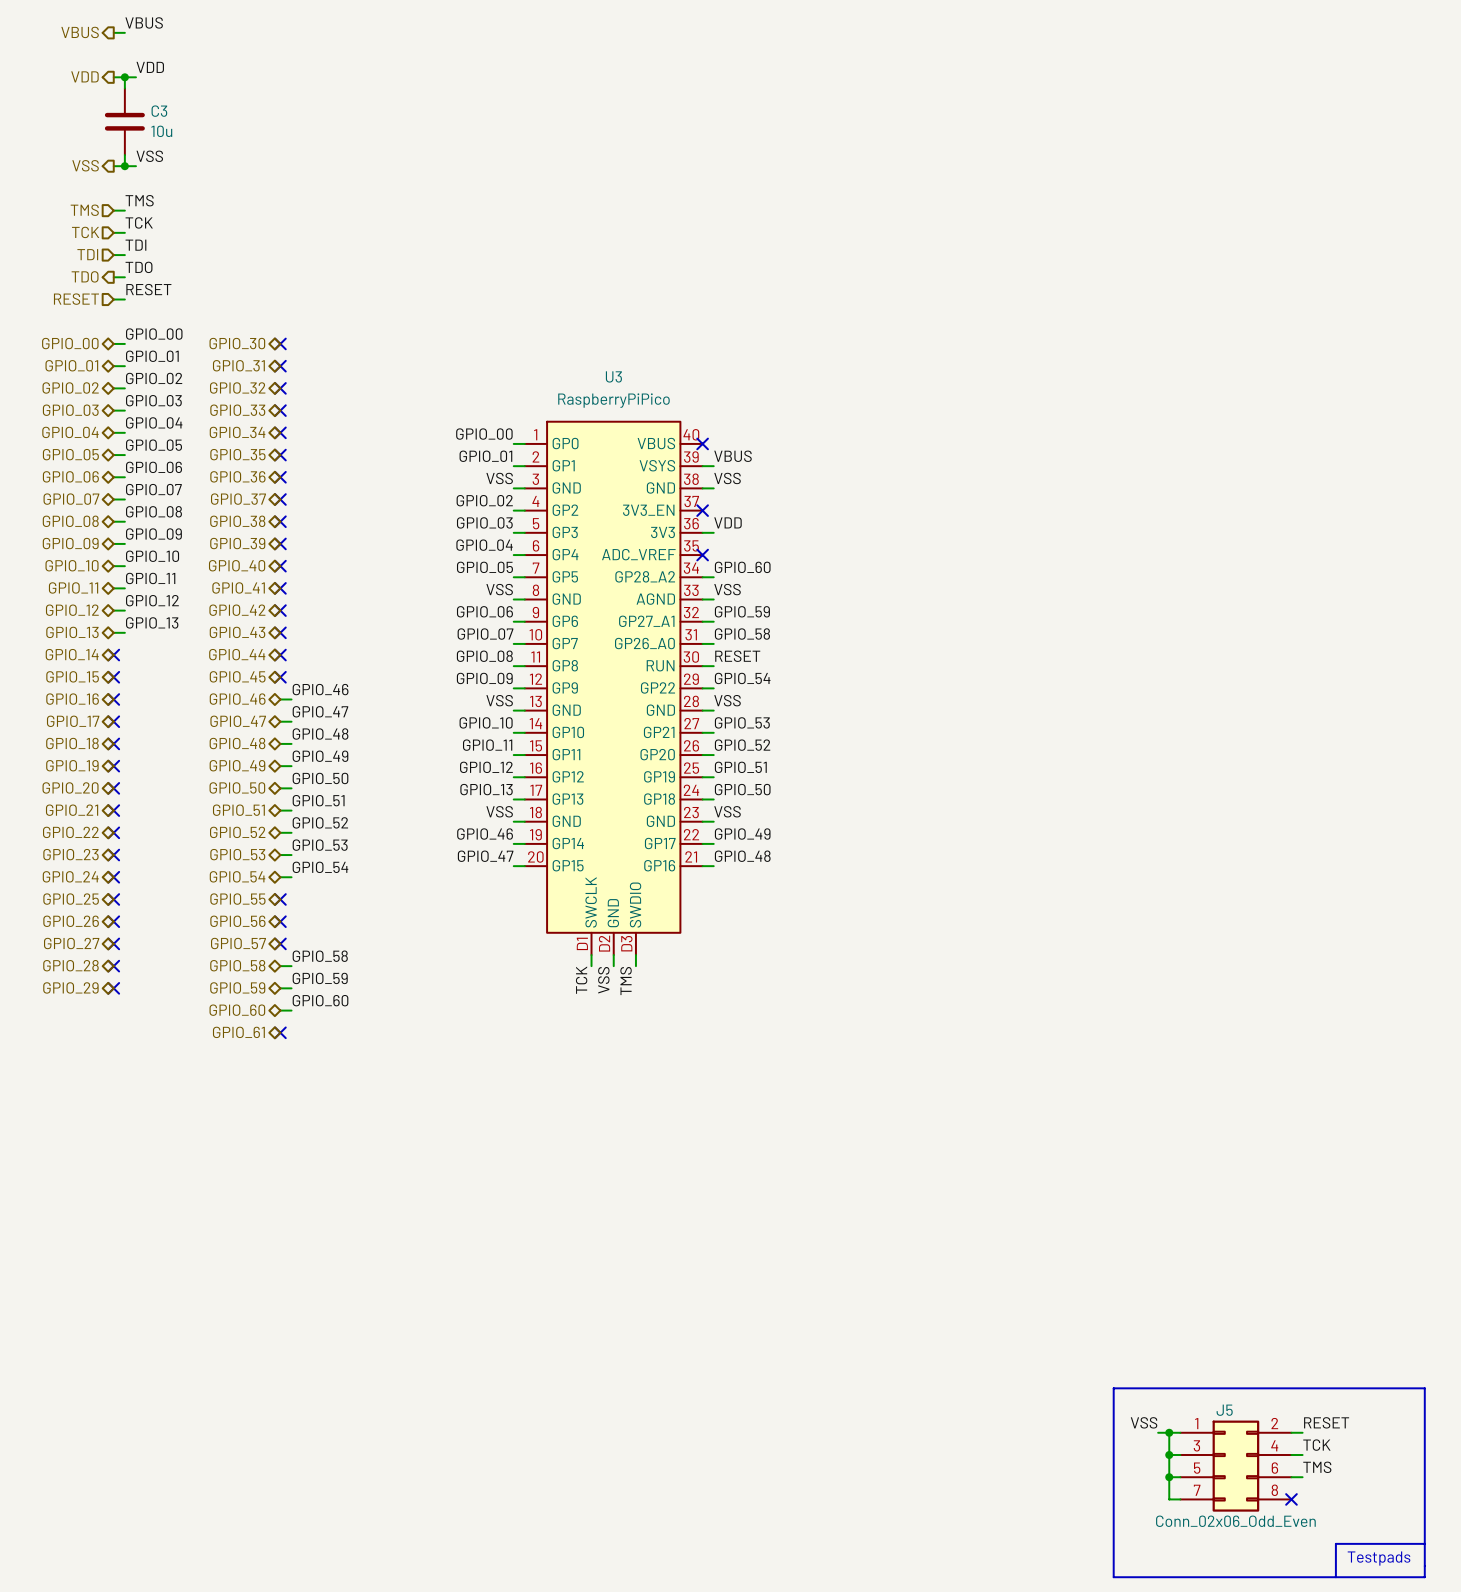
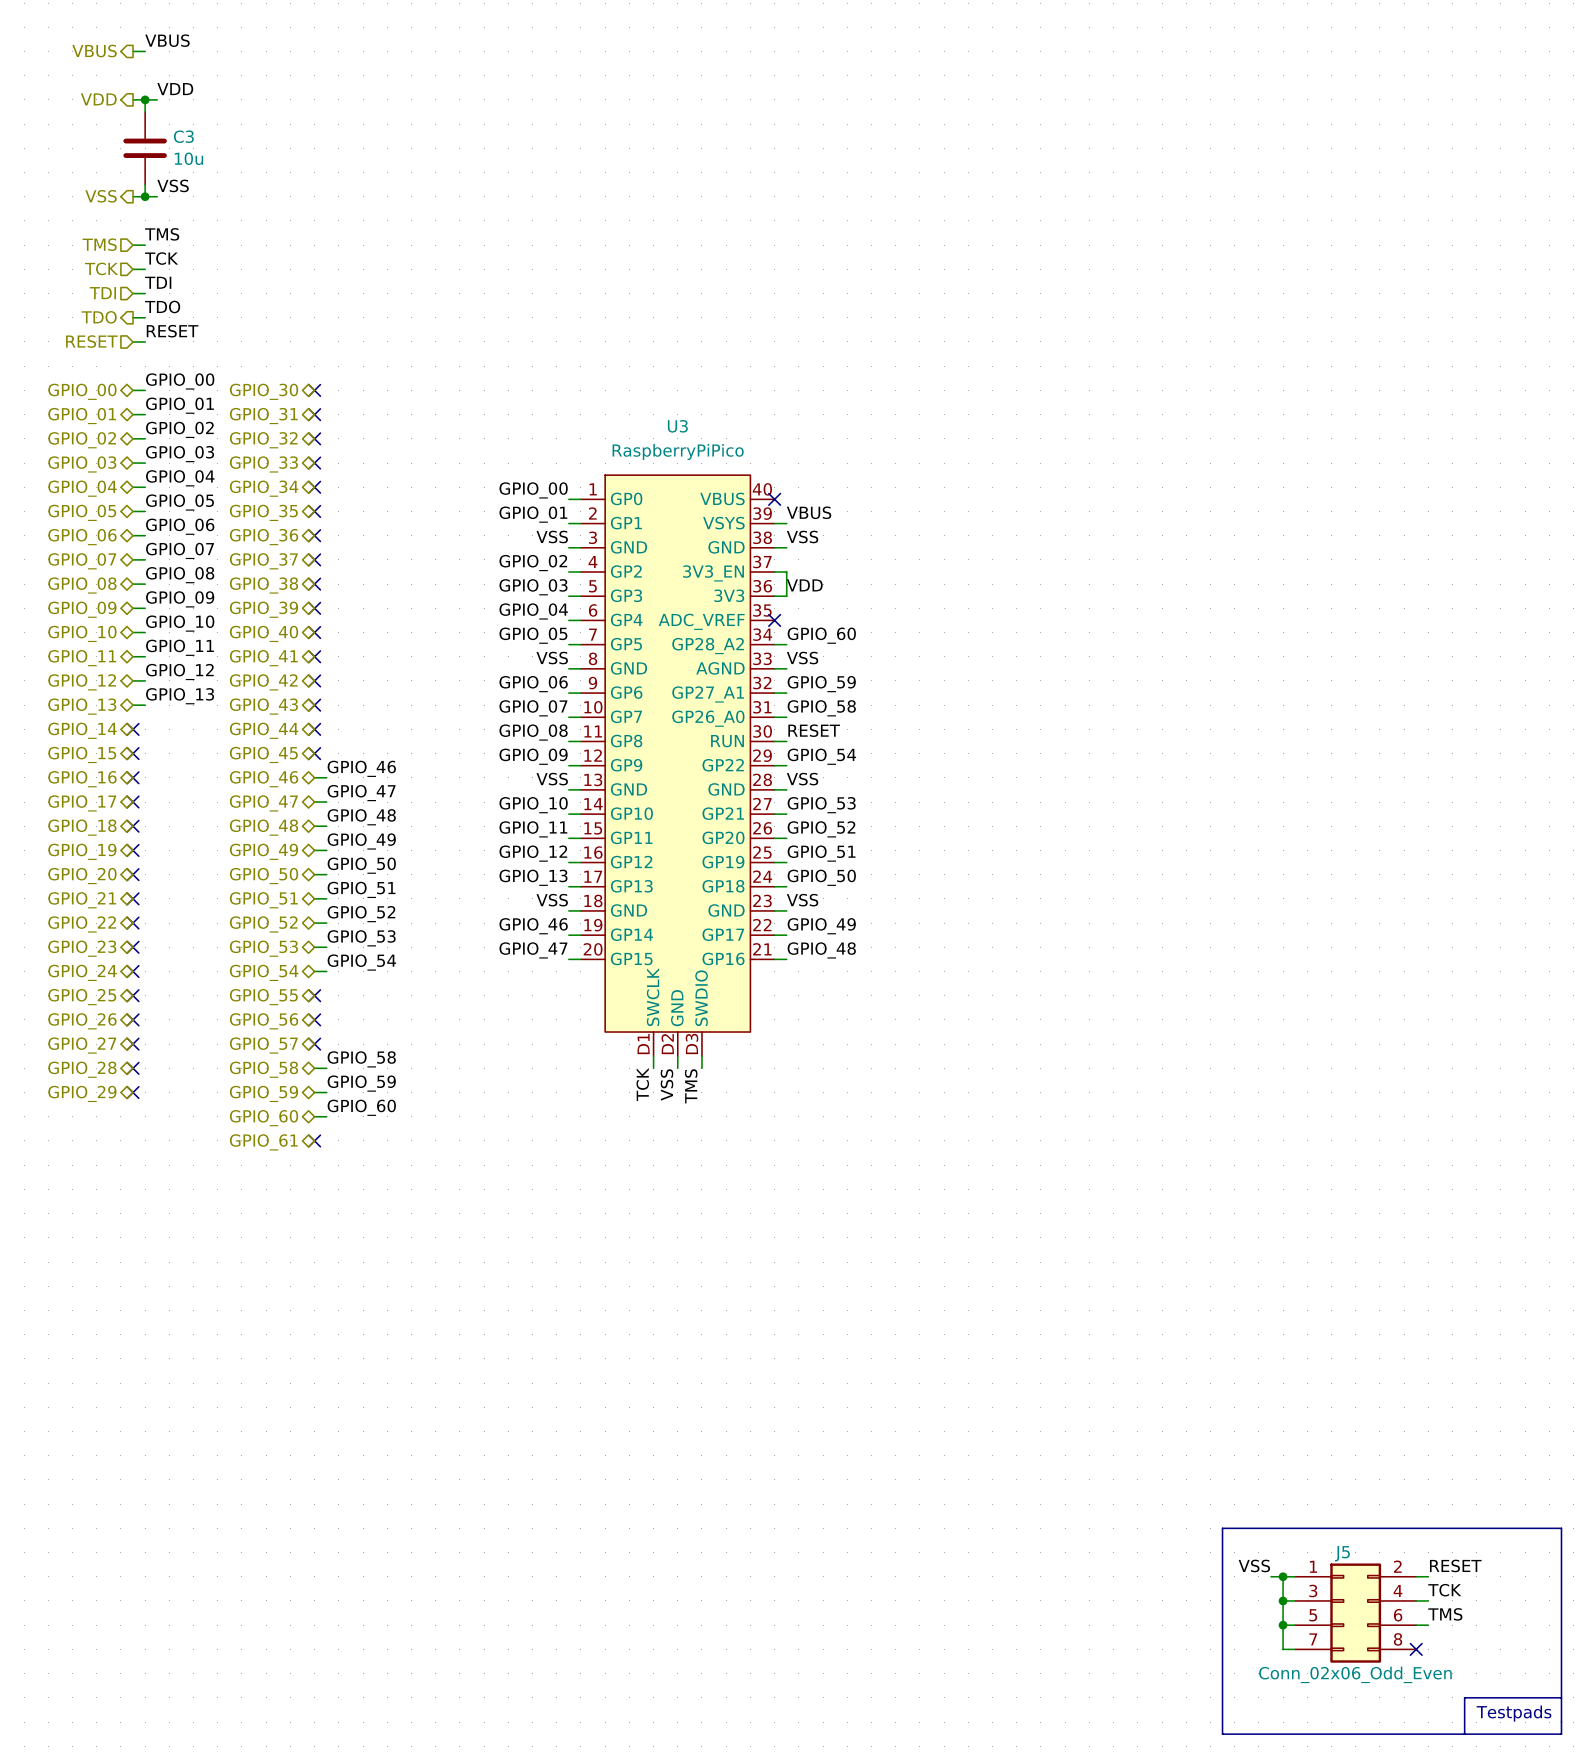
wire: none -> (774, 572) (786, 572) (786, 596)
no-connect mark: (702, 510) -> none

